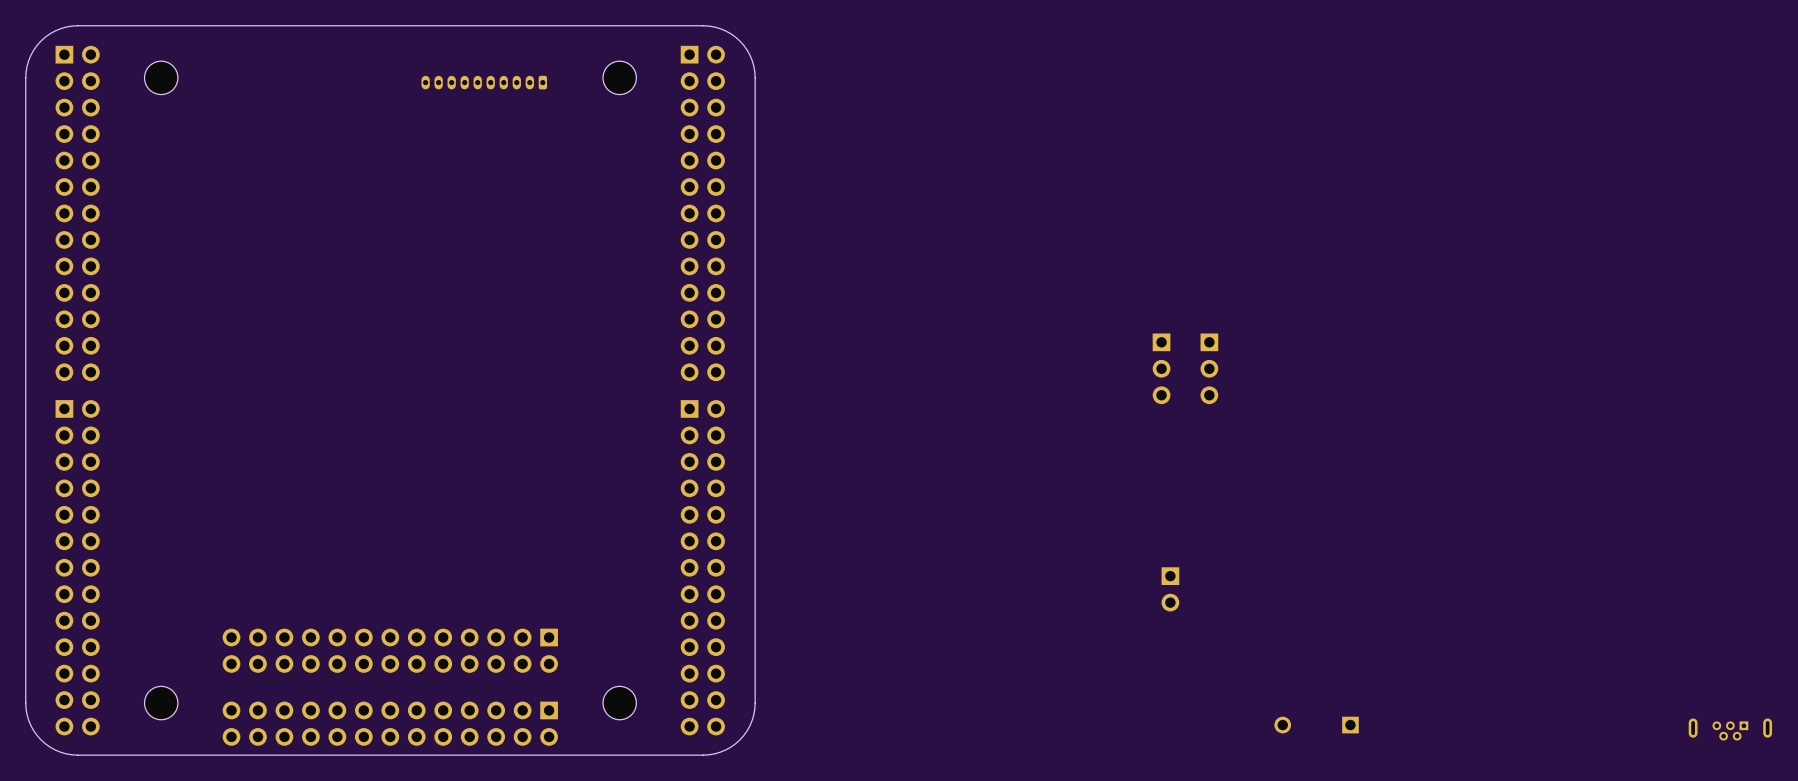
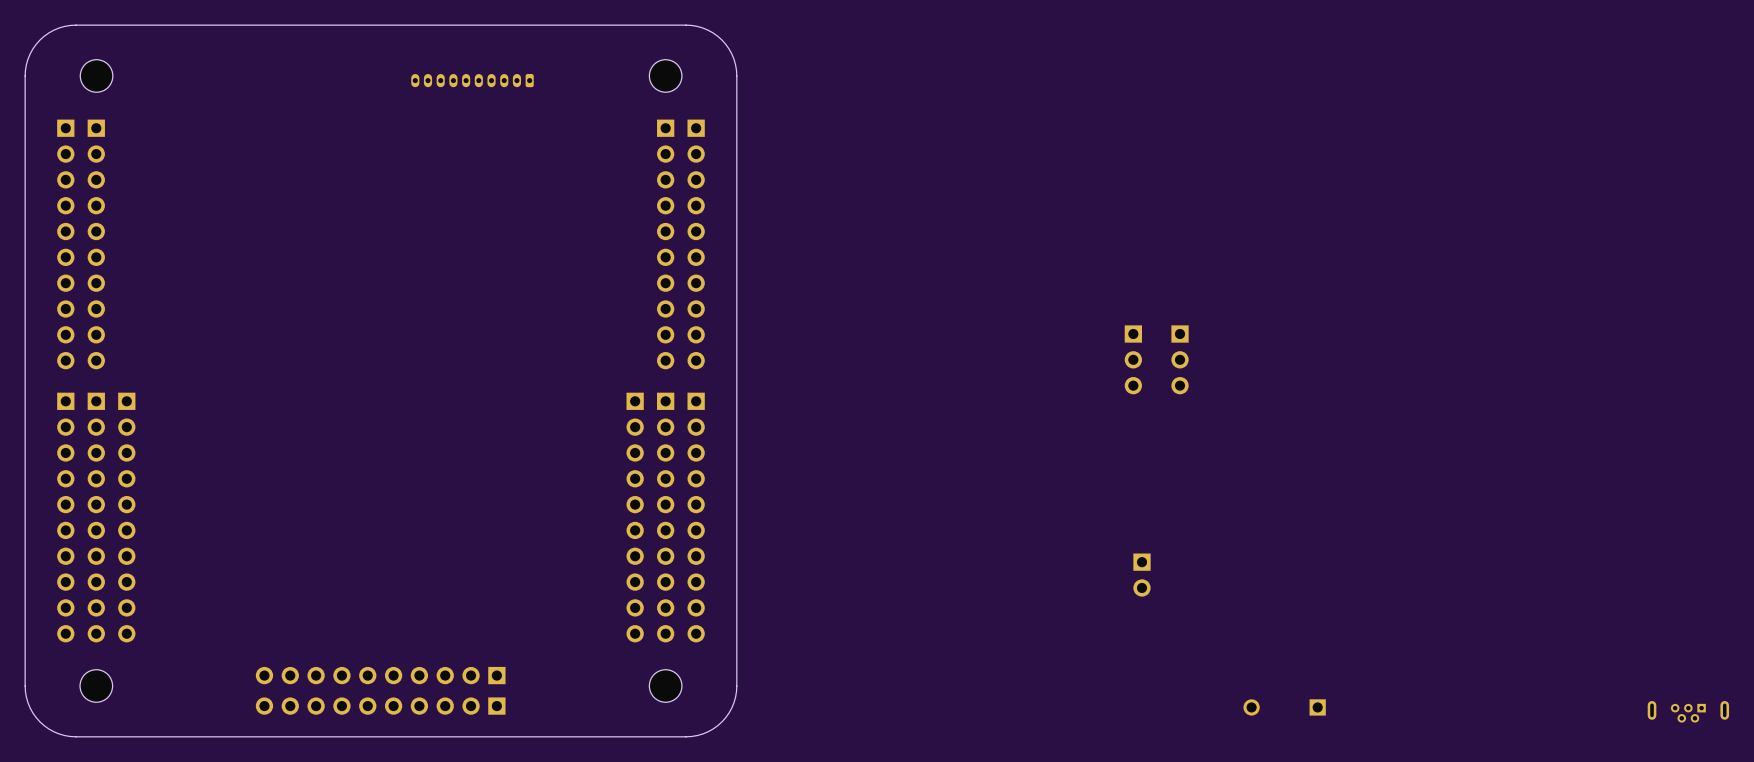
part position: (161, 77) -> (96, 75)
part position: (619, 77) -> (665, 75)
part: (77, 213) -> none
part: (702, 213) -> none
part: none -> (65, 244)
part: none -> (96, 244)
part: none -> (665, 244)
part: none -> (696, 244)
part: none -> (65, 517)
part: none -> (96, 517)
part: none -> (126, 517)
part: none -> (635, 517)
part: none -> (665, 517)
part: none -> (696, 517)
part: (77, 567) -> none
part: (702, 567) -> none
part: (390, 650) -> none
part: none -> (380, 675)
part footprint: [222, 701, 558, 746] -> [255, 697, 506, 715]
part position: (161, 703) -> (96, 685)
part position: (619, 703) -> (665, 685)

